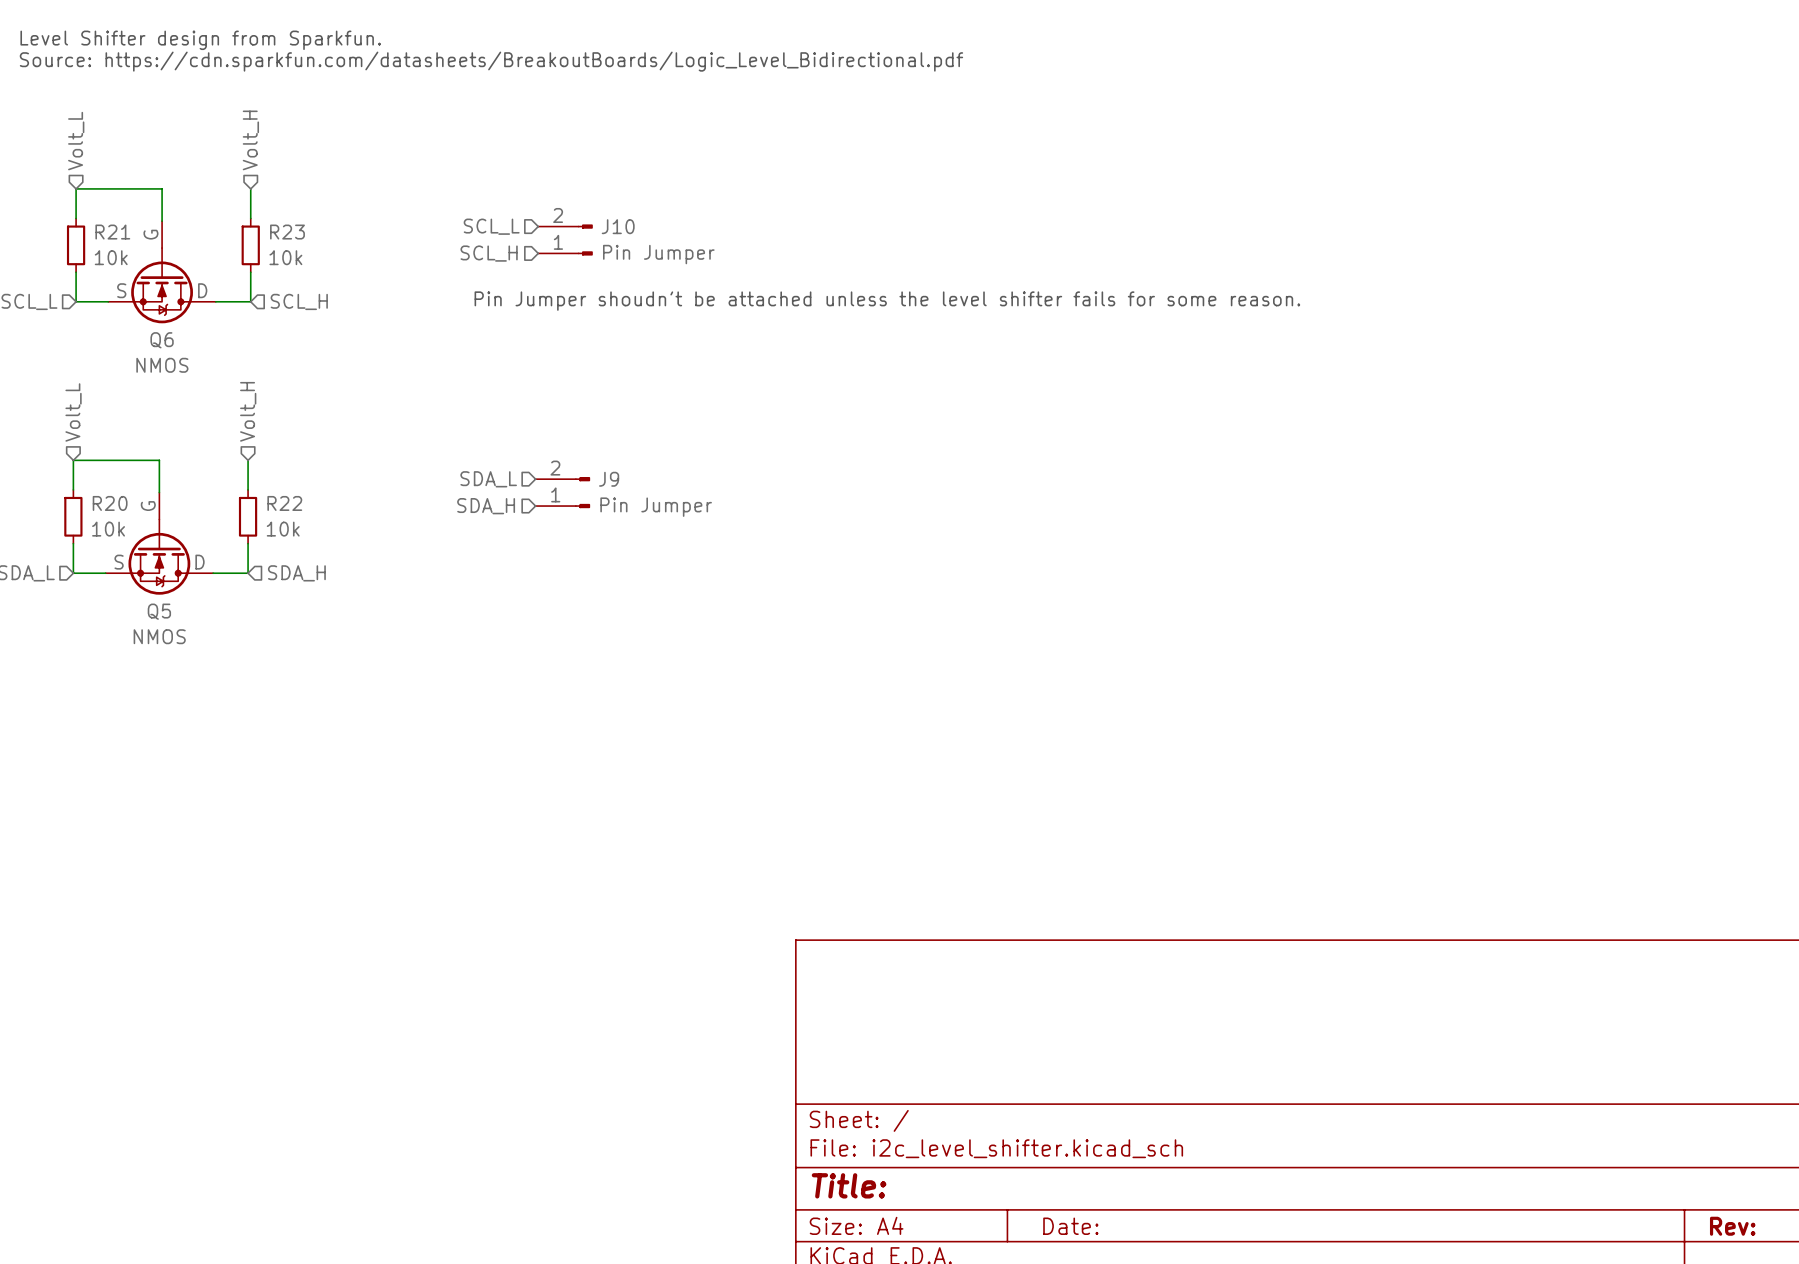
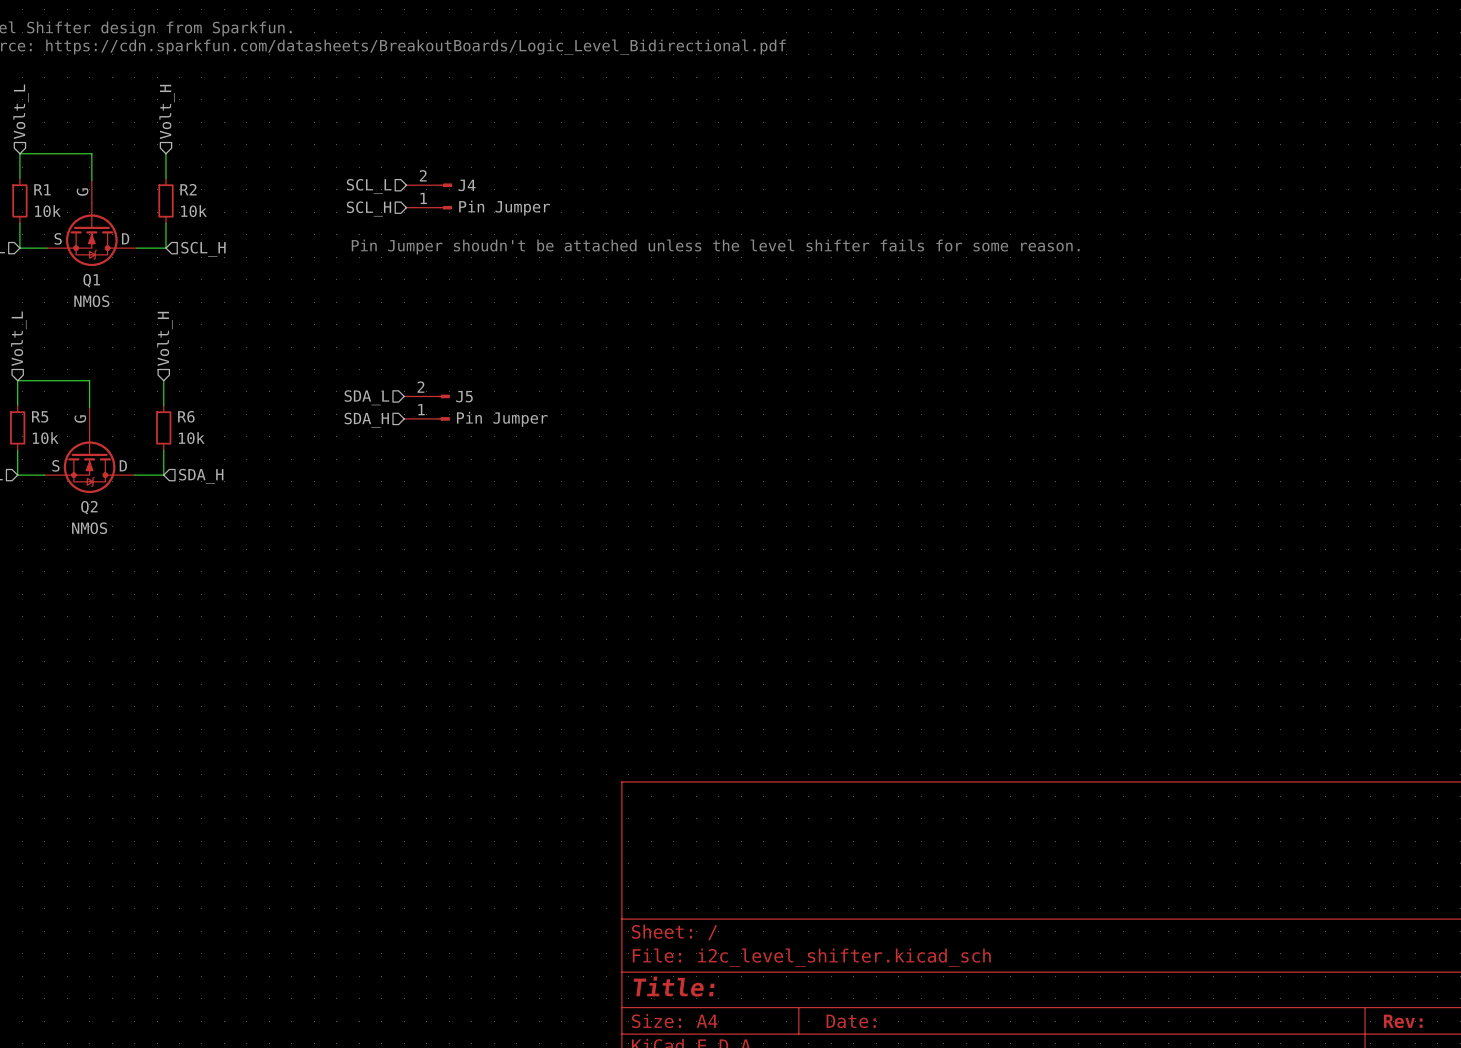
J10 name: J10 (618, 226) -> J4 (467, 185)
R21 name: R21 (112, 232) -> R1 (42, 189)
R23 name: R23 (287, 232) -> R2 (188, 189)
Q6 name: Q6 (162, 340) -> Q1 (91, 280)
J9 name: J9 (609, 479) -> J5 (464, 396)
R20 name: R20 (110, 503) -> R5 (40, 416)
R22 name: R22 (284, 503) -> R6 (186, 416)
Q5 name: Q5 (159, 611) -> Q2 (89, 507)

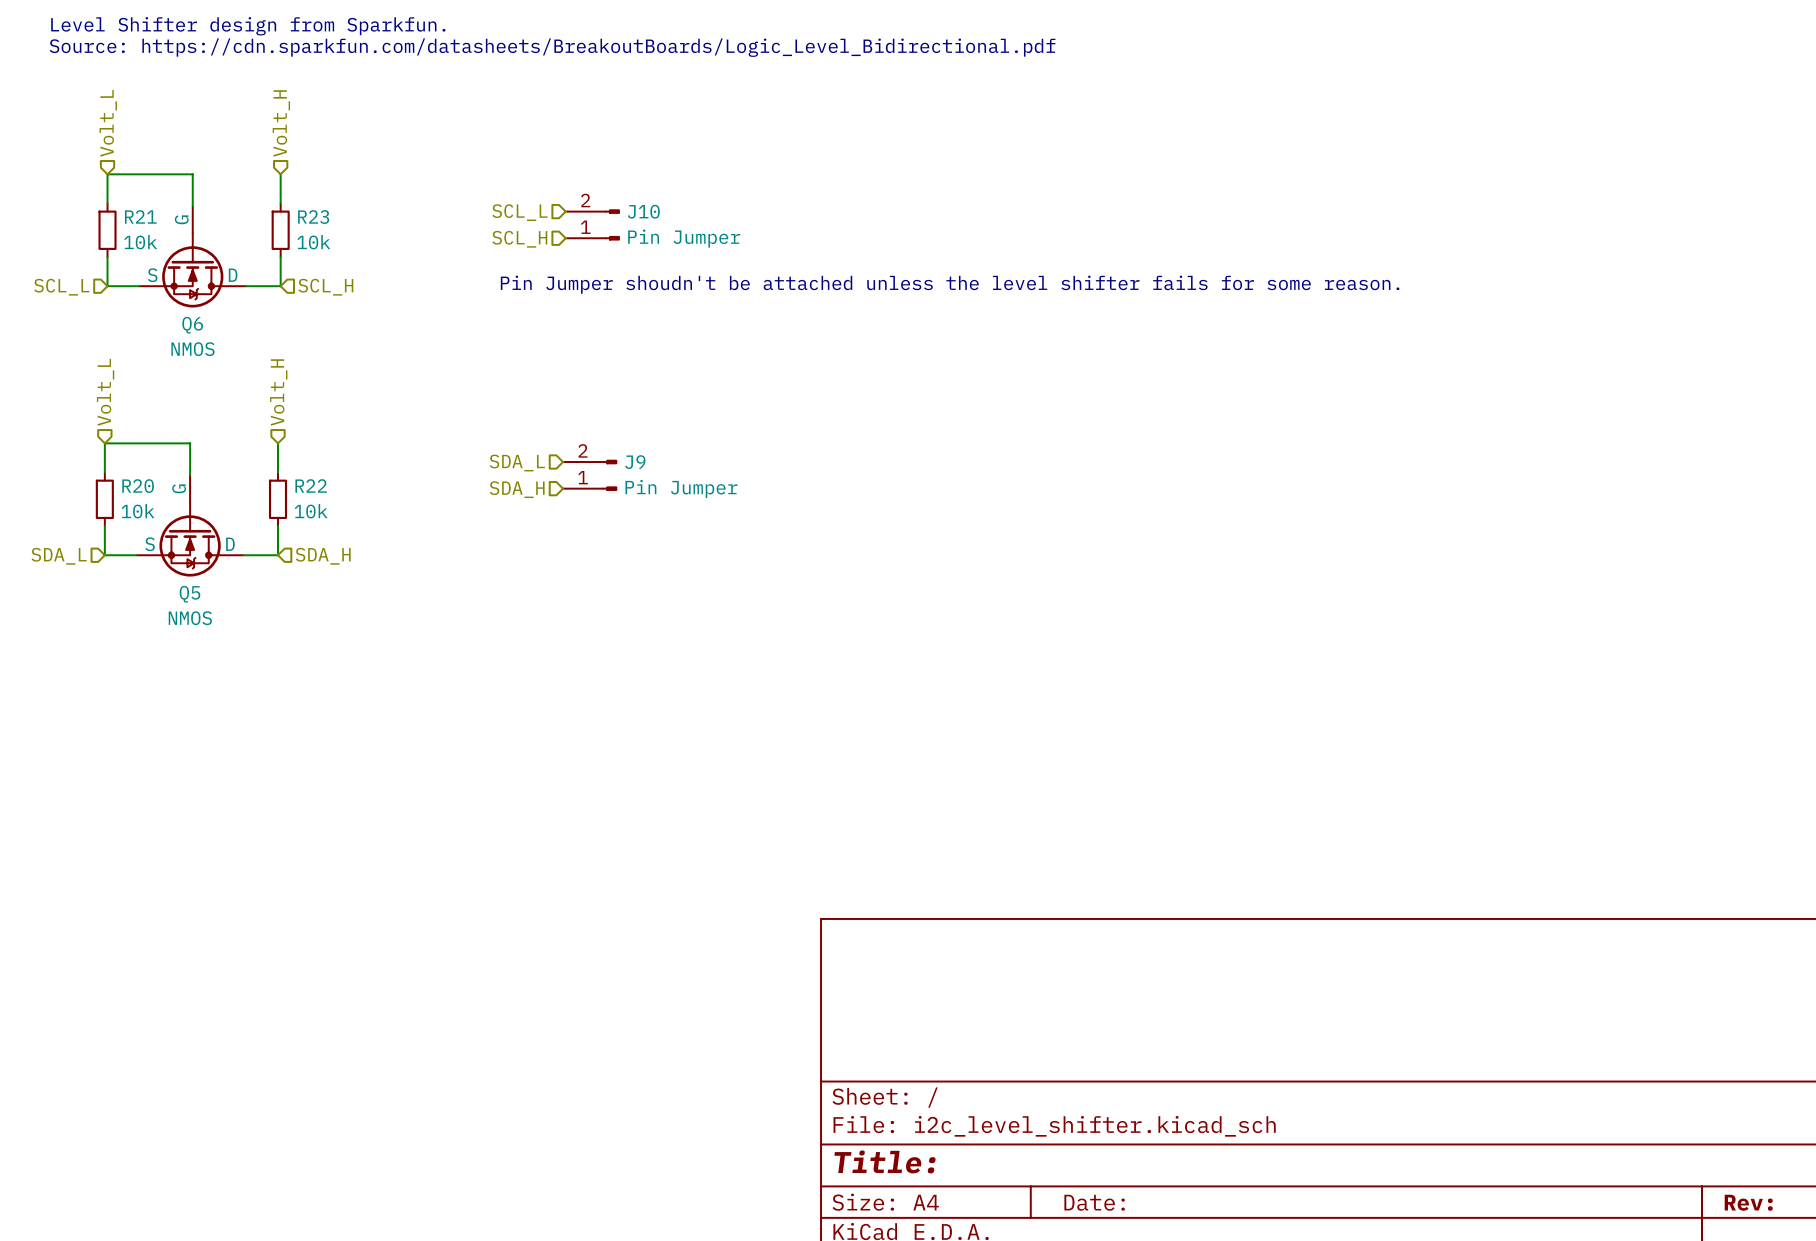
J4 name: J4 (467, 185) -> J10 (643, 211)
R1 name: R1 (42, 189) -> R21 (140, 216)
R2 name: R2 (188, 189) -> R23 (313, 217)
Q1 name: Q1 (91, 280) -> Q6 (192, 325)
J5 name: J5 (464, 396) -> J9 (635, 462)
R5 name: R5 (40, 416) -> R20 (138, 486)
R6 name: R6 (186, 416) -> R22 (311, 485)
Q2 name: Q2 (89, 507) -> Q5 (189, 594)

